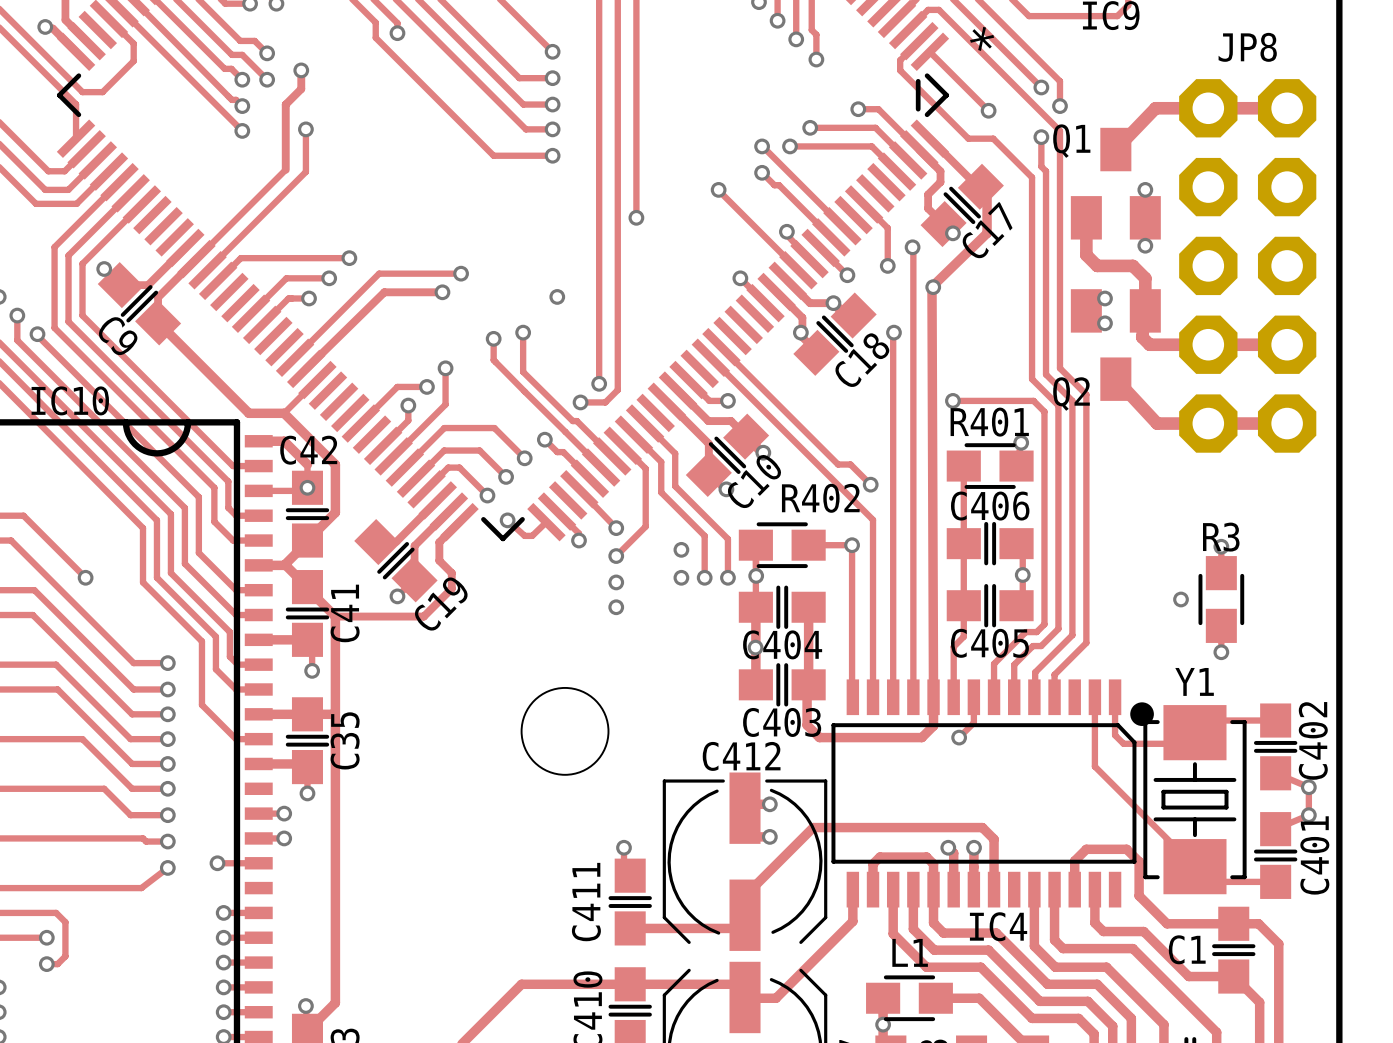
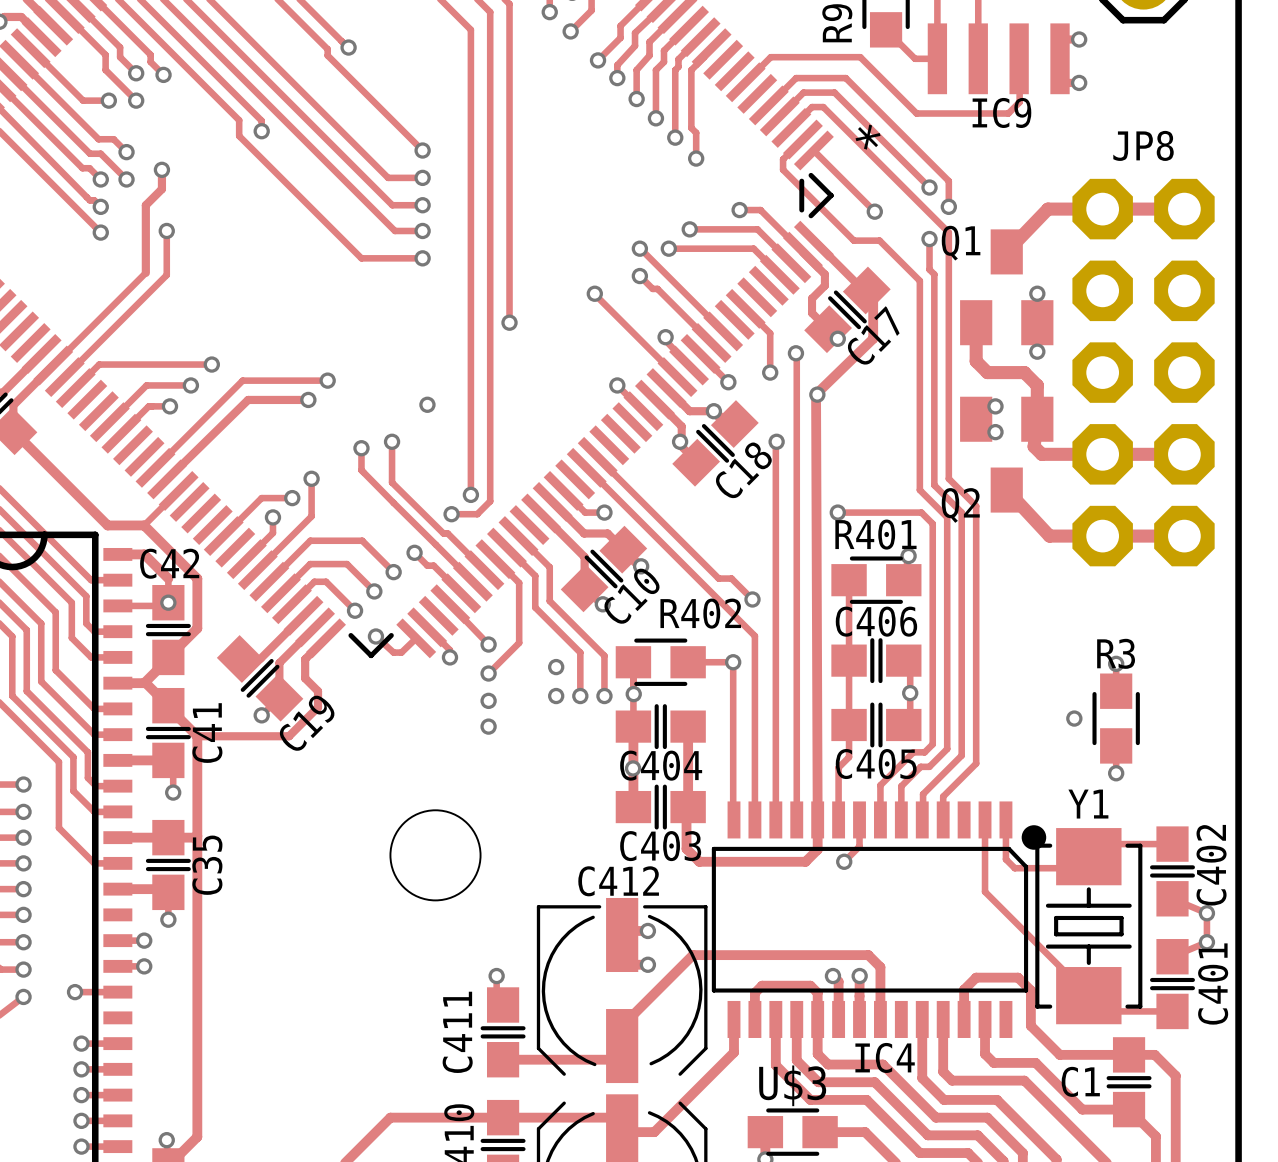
L1 name: L1 (910, 952) -> U$3 (792, 1085)

